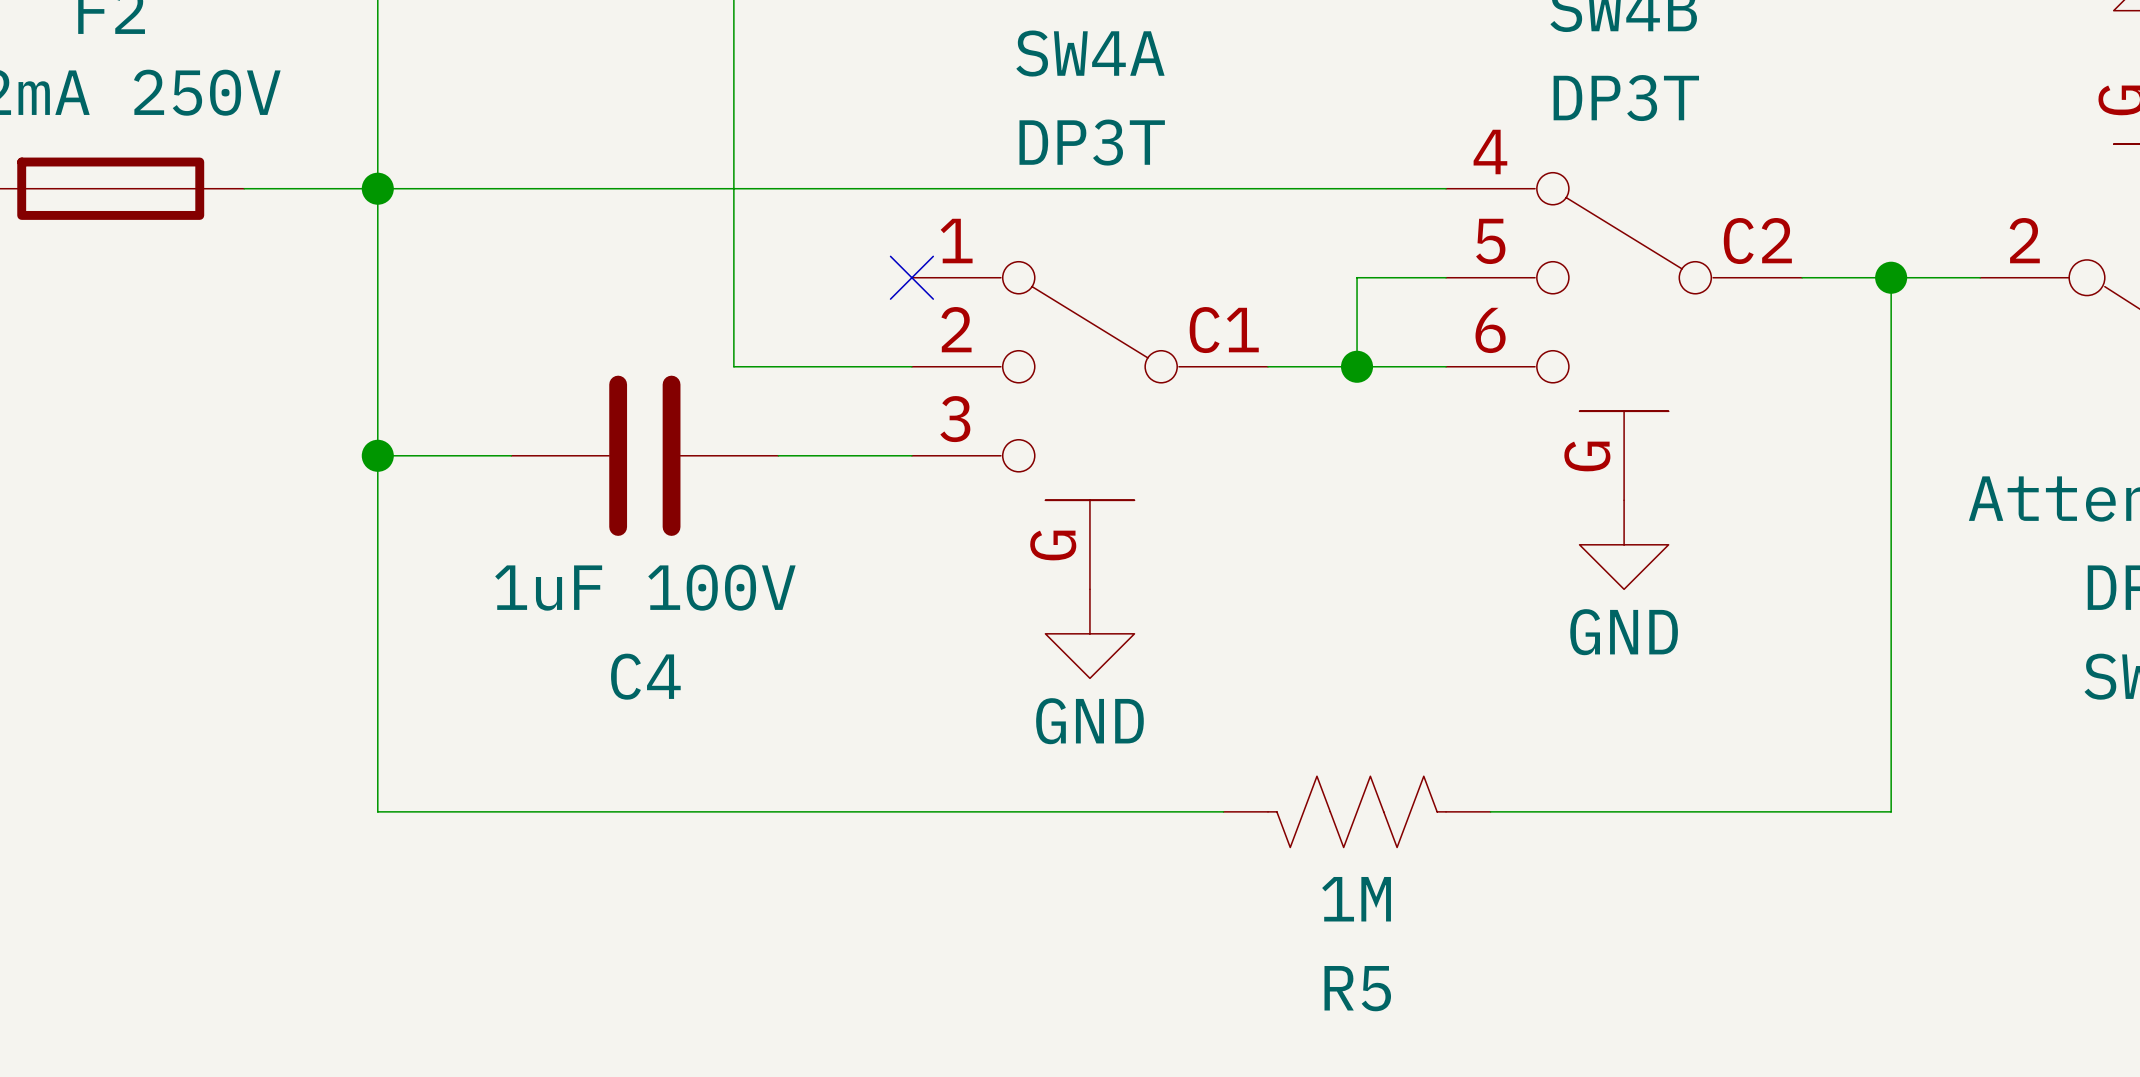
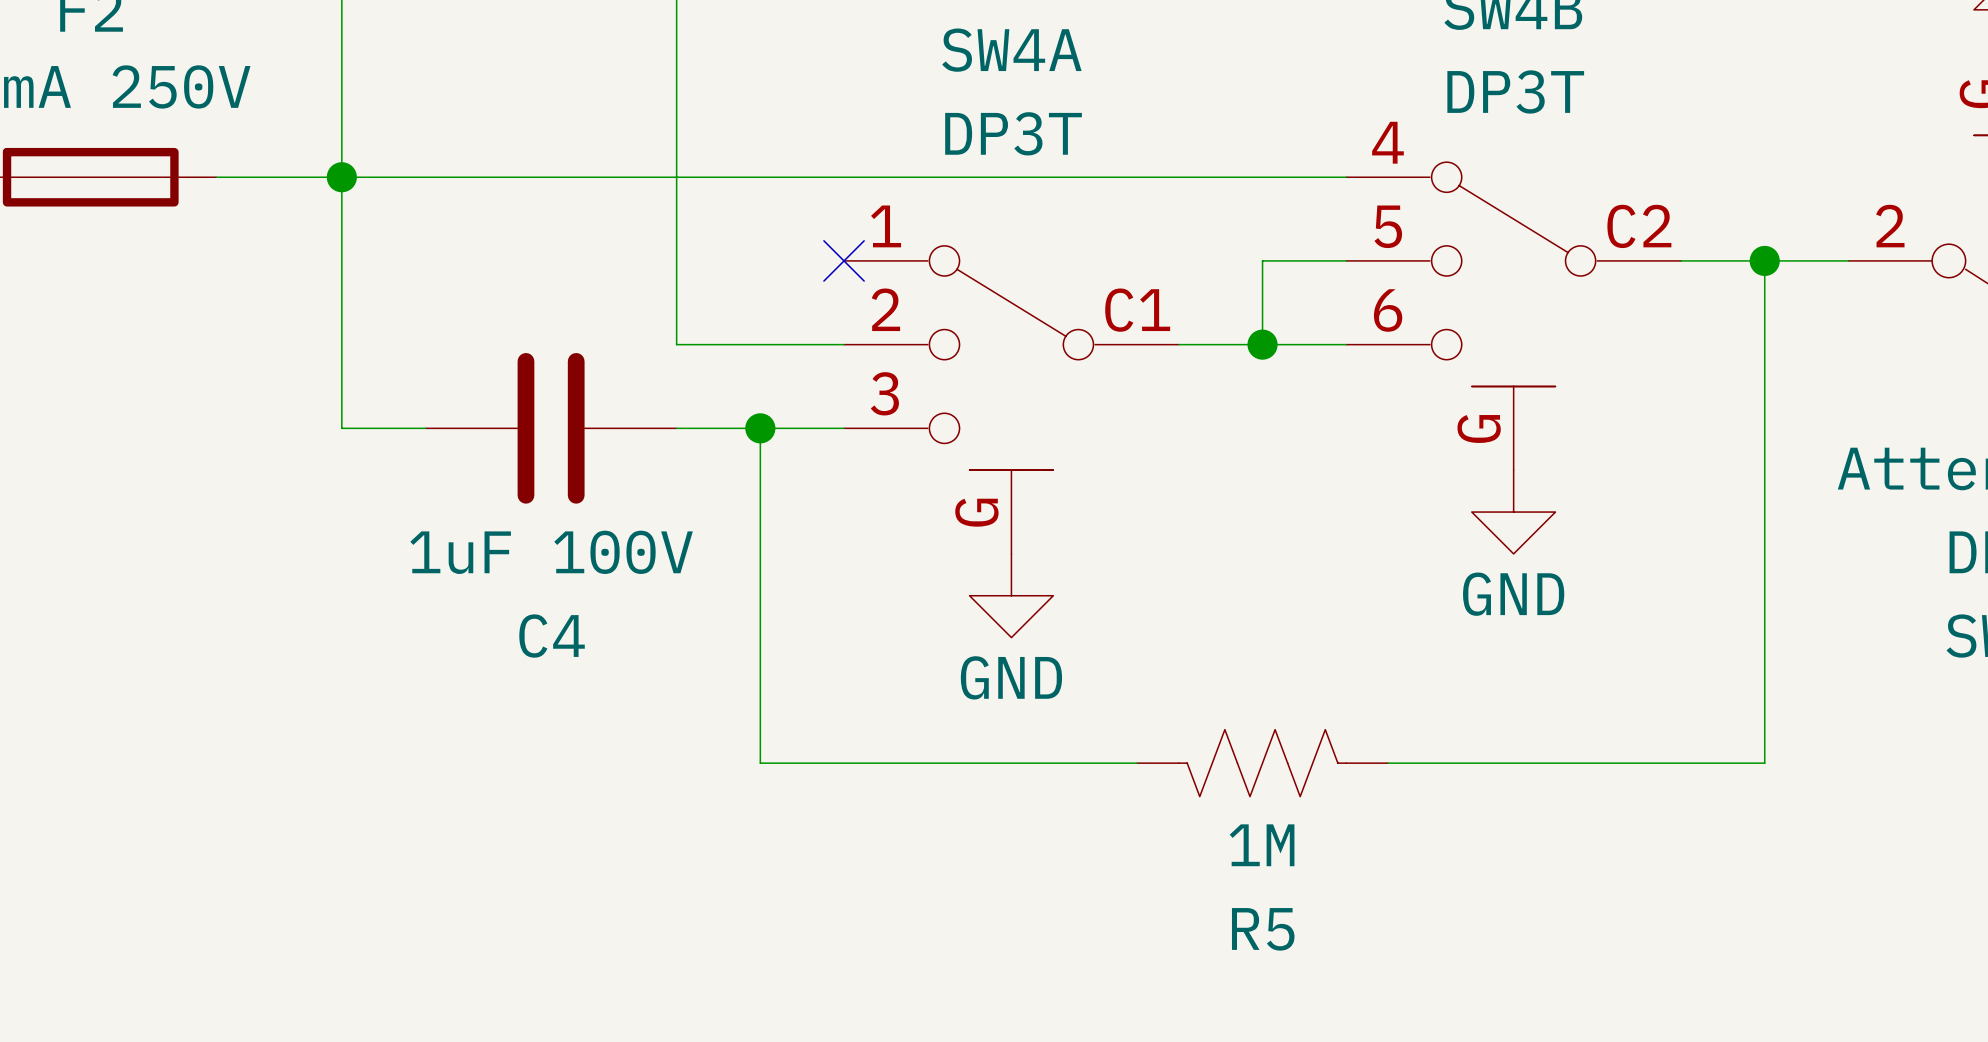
wire: (377, 455) (377, 811) (822, 811) -> (760, 428) (760, 763)
junction: (377, 455) -> none
C4 position: (644, 455) -> (551, 428)
junction: none -> (760, 428)

